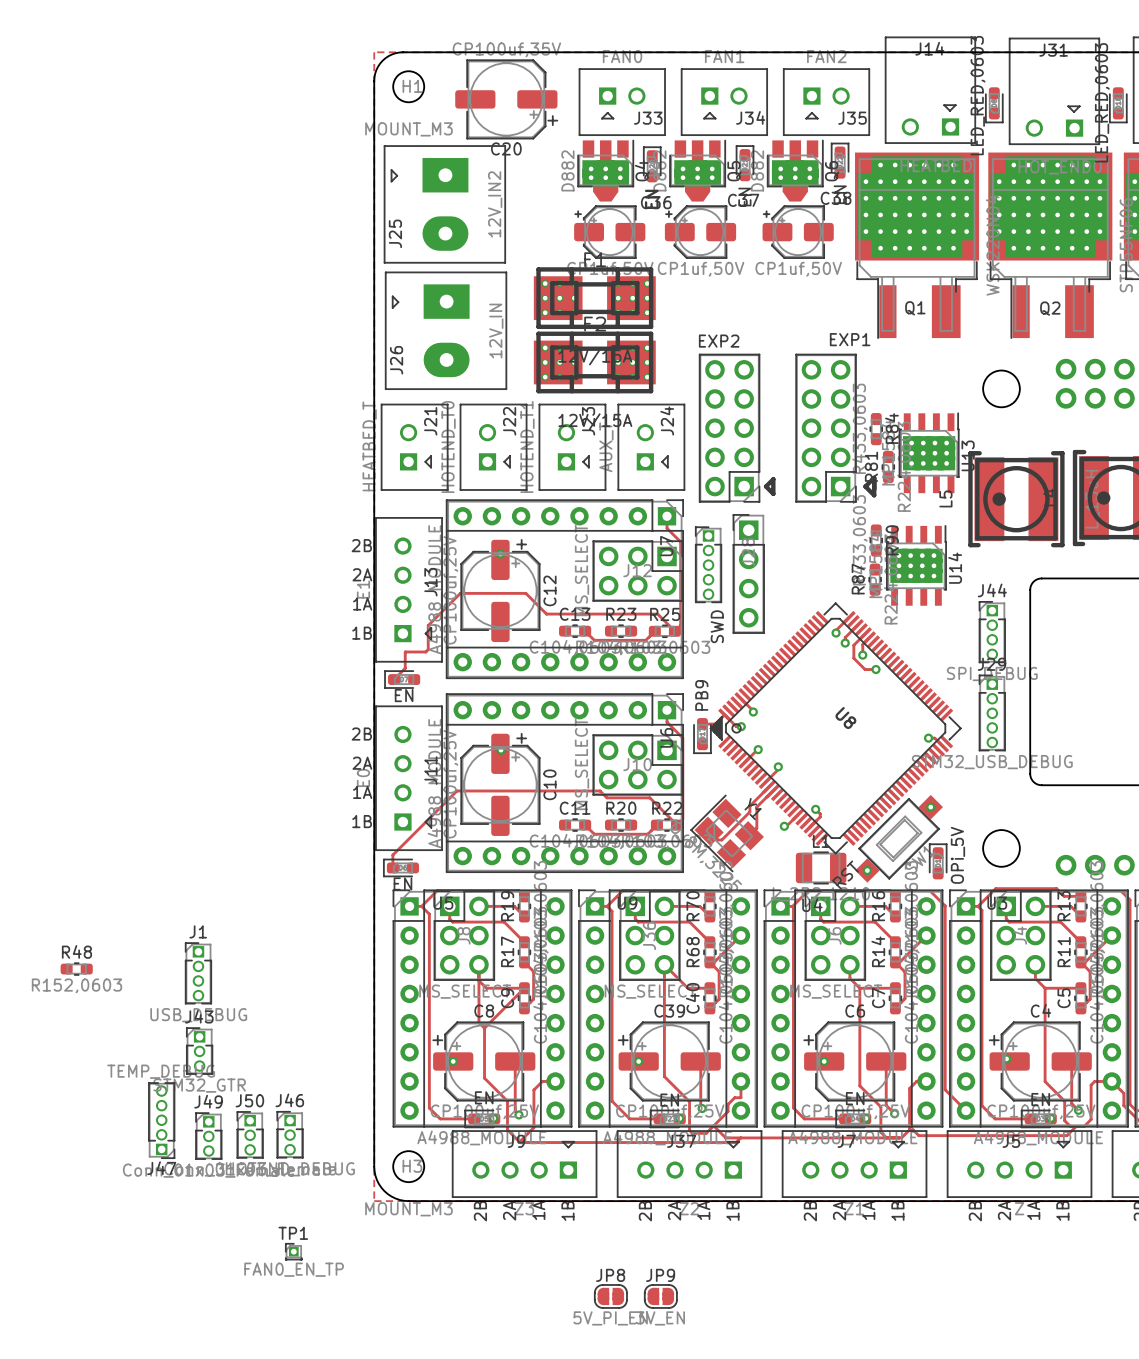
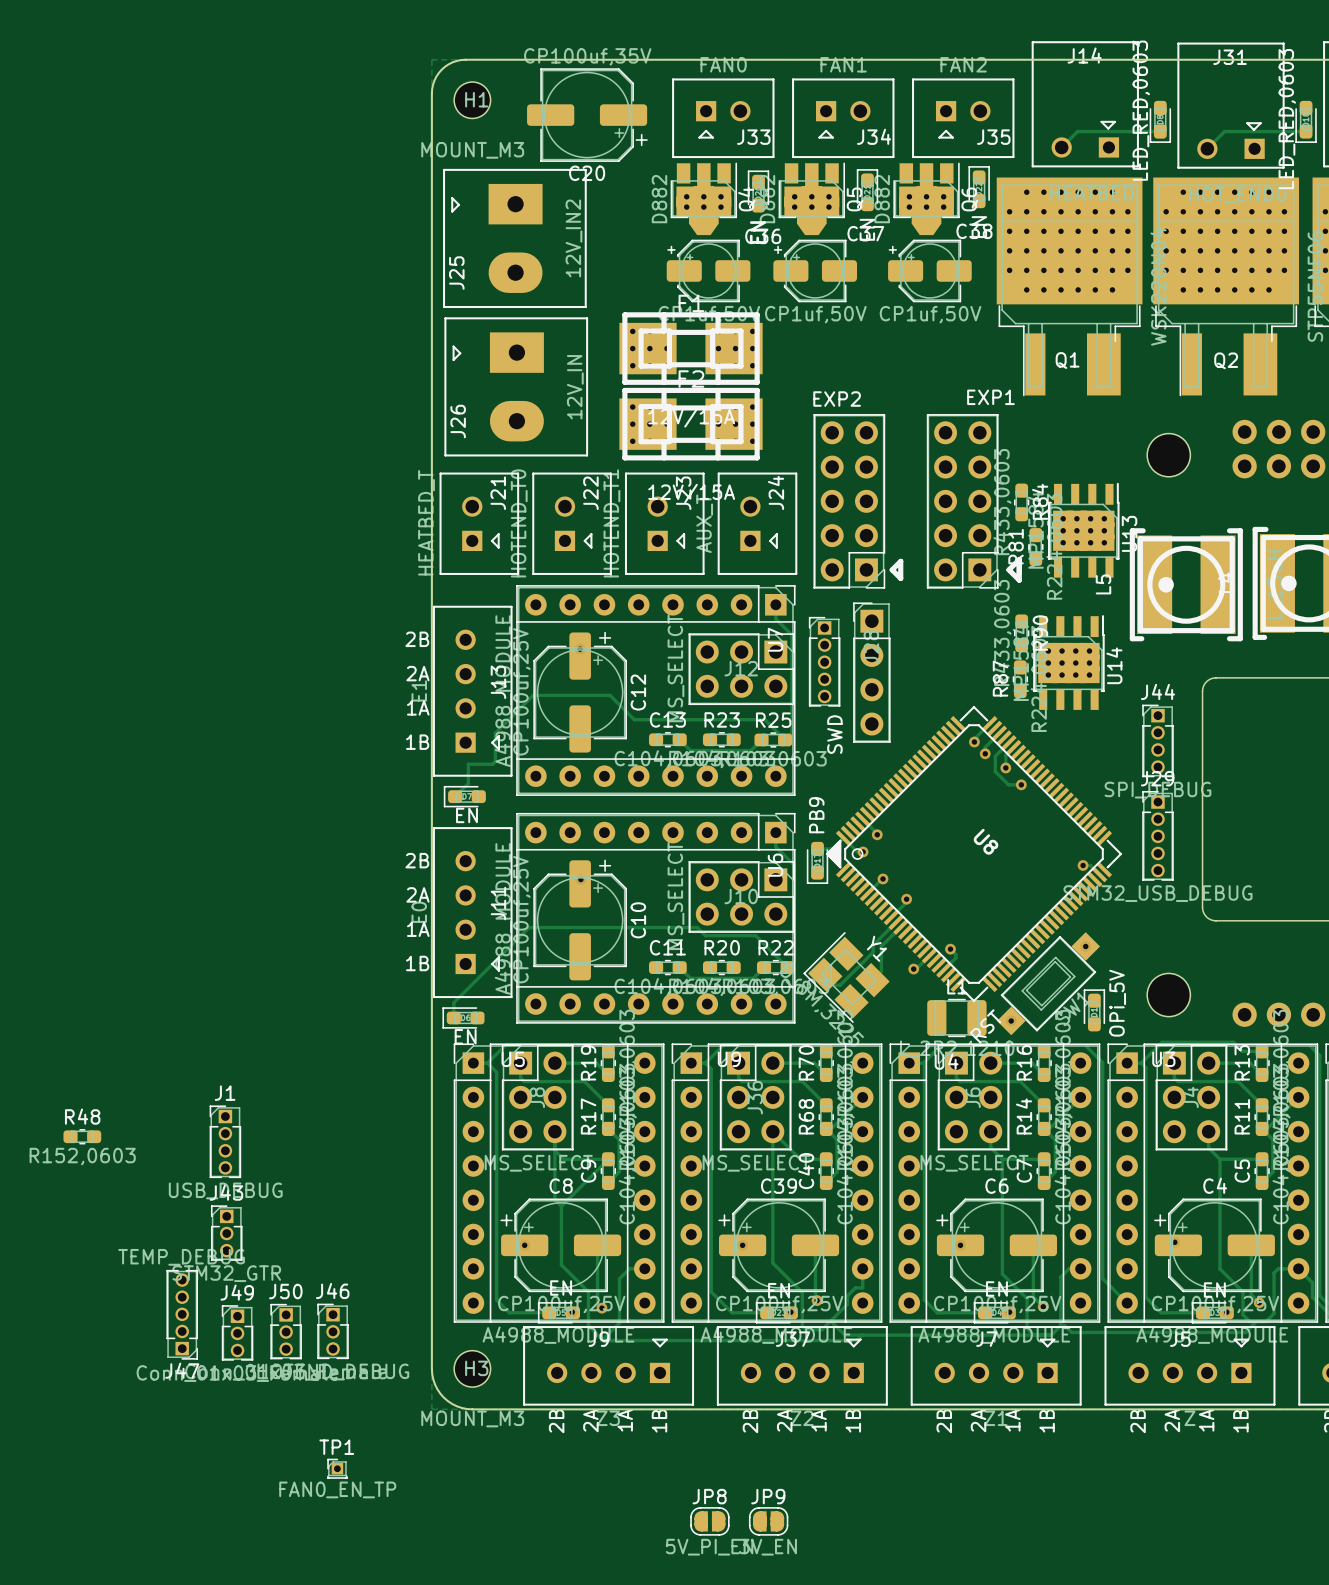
track: none -> (1160, 131) (1077, 131) (1061, 147)
track: none -> (1306, 131) (1224, 131) (1207, 148)

